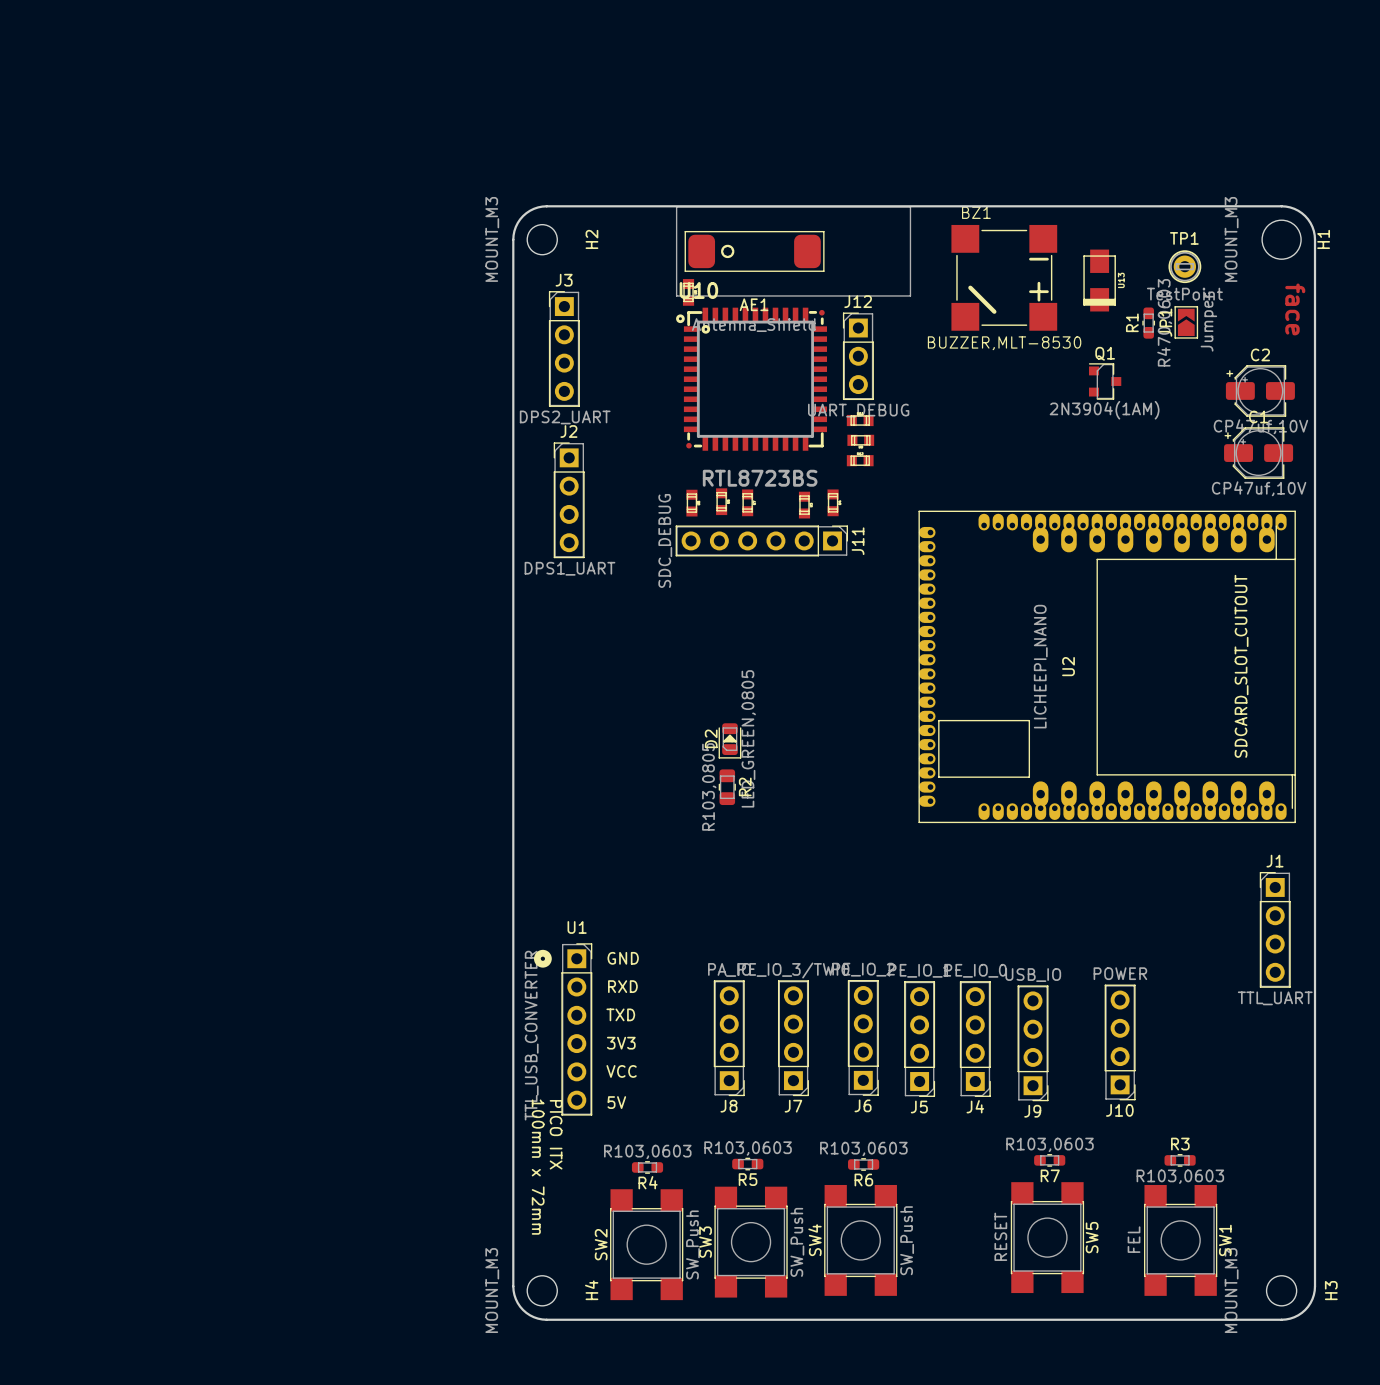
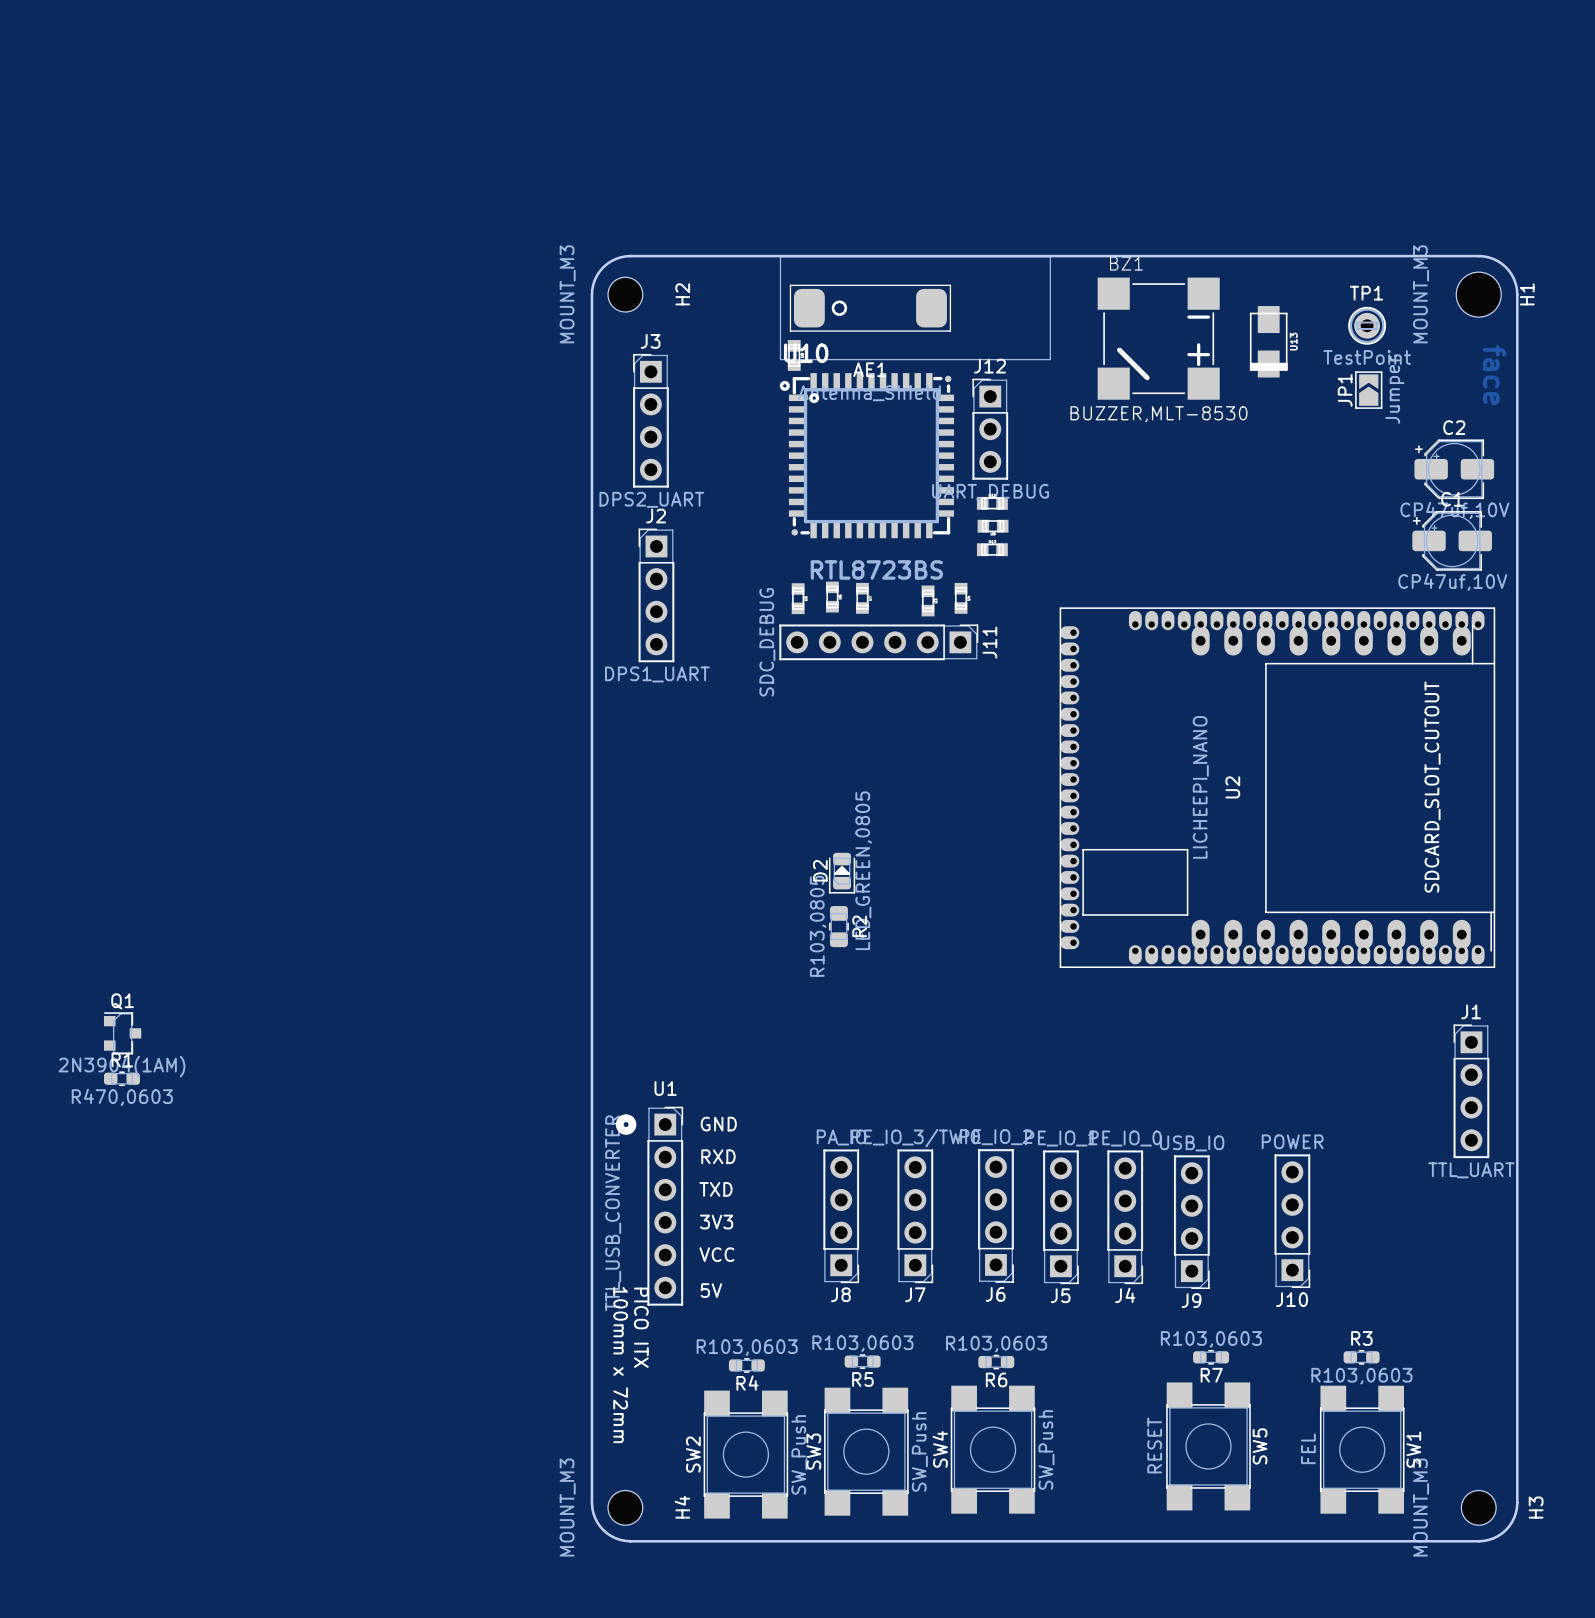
R1 rotation: 0° (1148, 323) -> 90° clockwise (121, 1078)
R1 position: (1148, 323) -> (121, 1078)
Q1 position: (1105, 381) -> (122, 1033)

